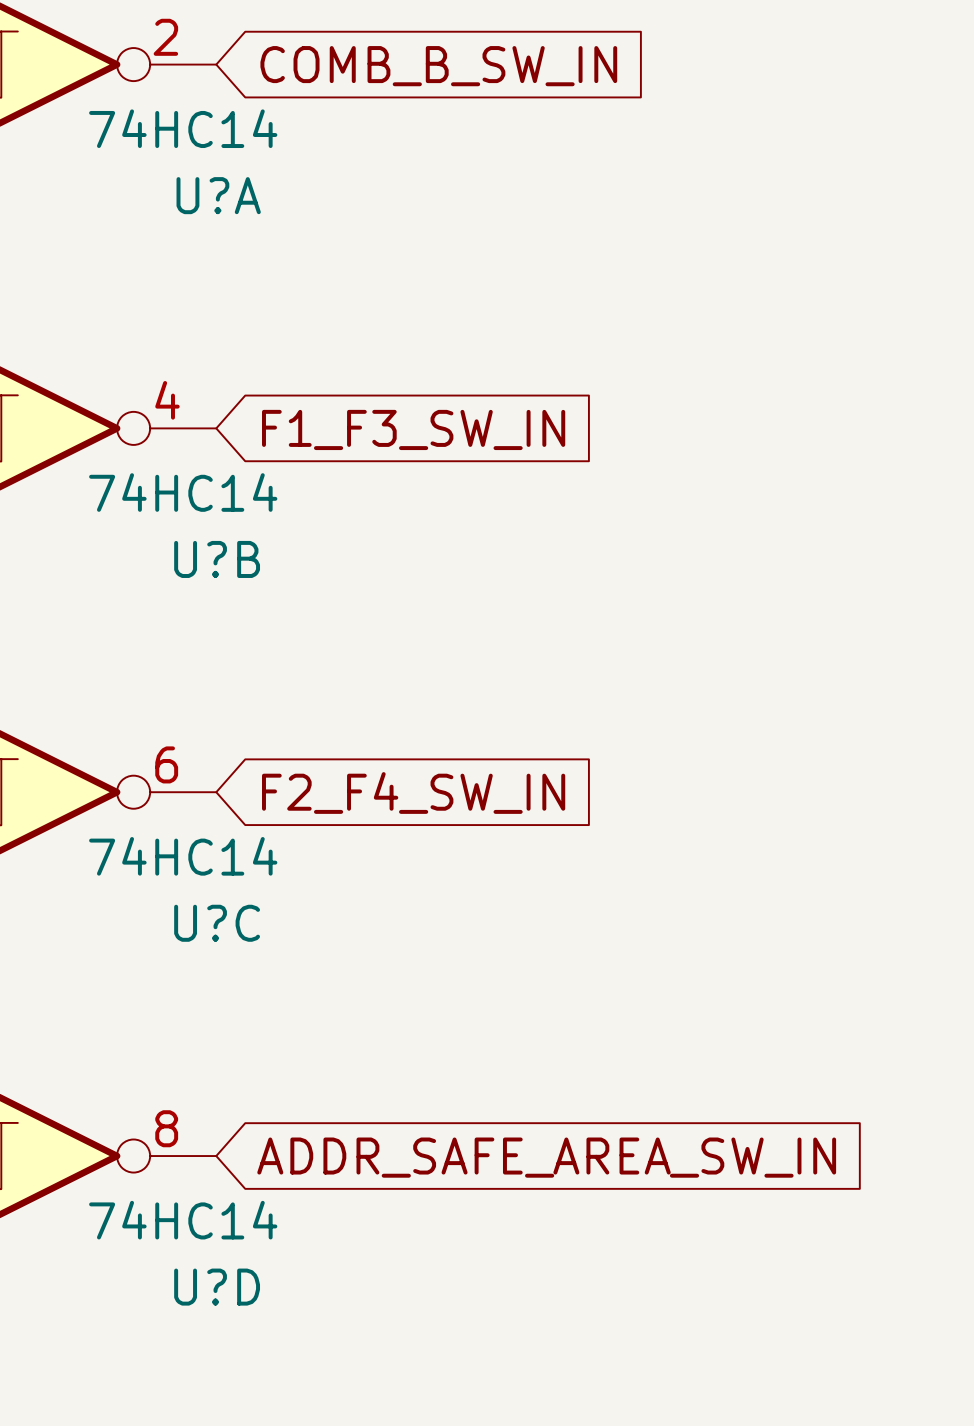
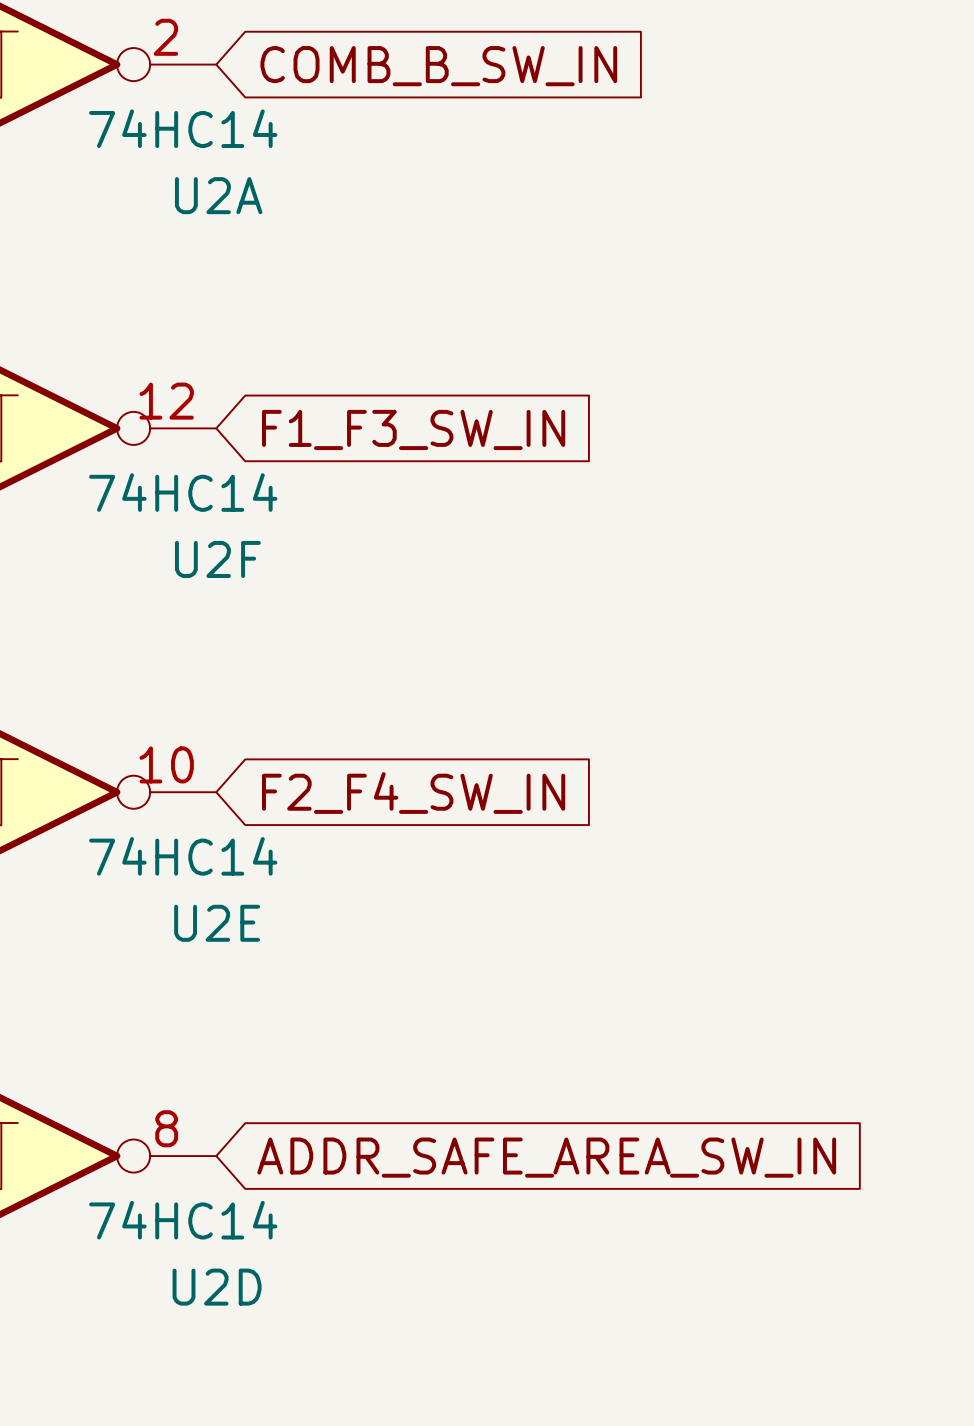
U?A name: U?A (218, 195) -> U2A (218, 195)
U?B pin number: 4 (167, 400) -> 12 (166, 401)
U?B name: U?B (217, 559) -> U2F (217, 559)
U?C pin number: 6 (166, 764) -> 10 (166, 764)
U?C name: U?C (217, 923) -> U2E (217, 923)
U?D name: U?D (217, 1287) -> U2D (217, 1287)

